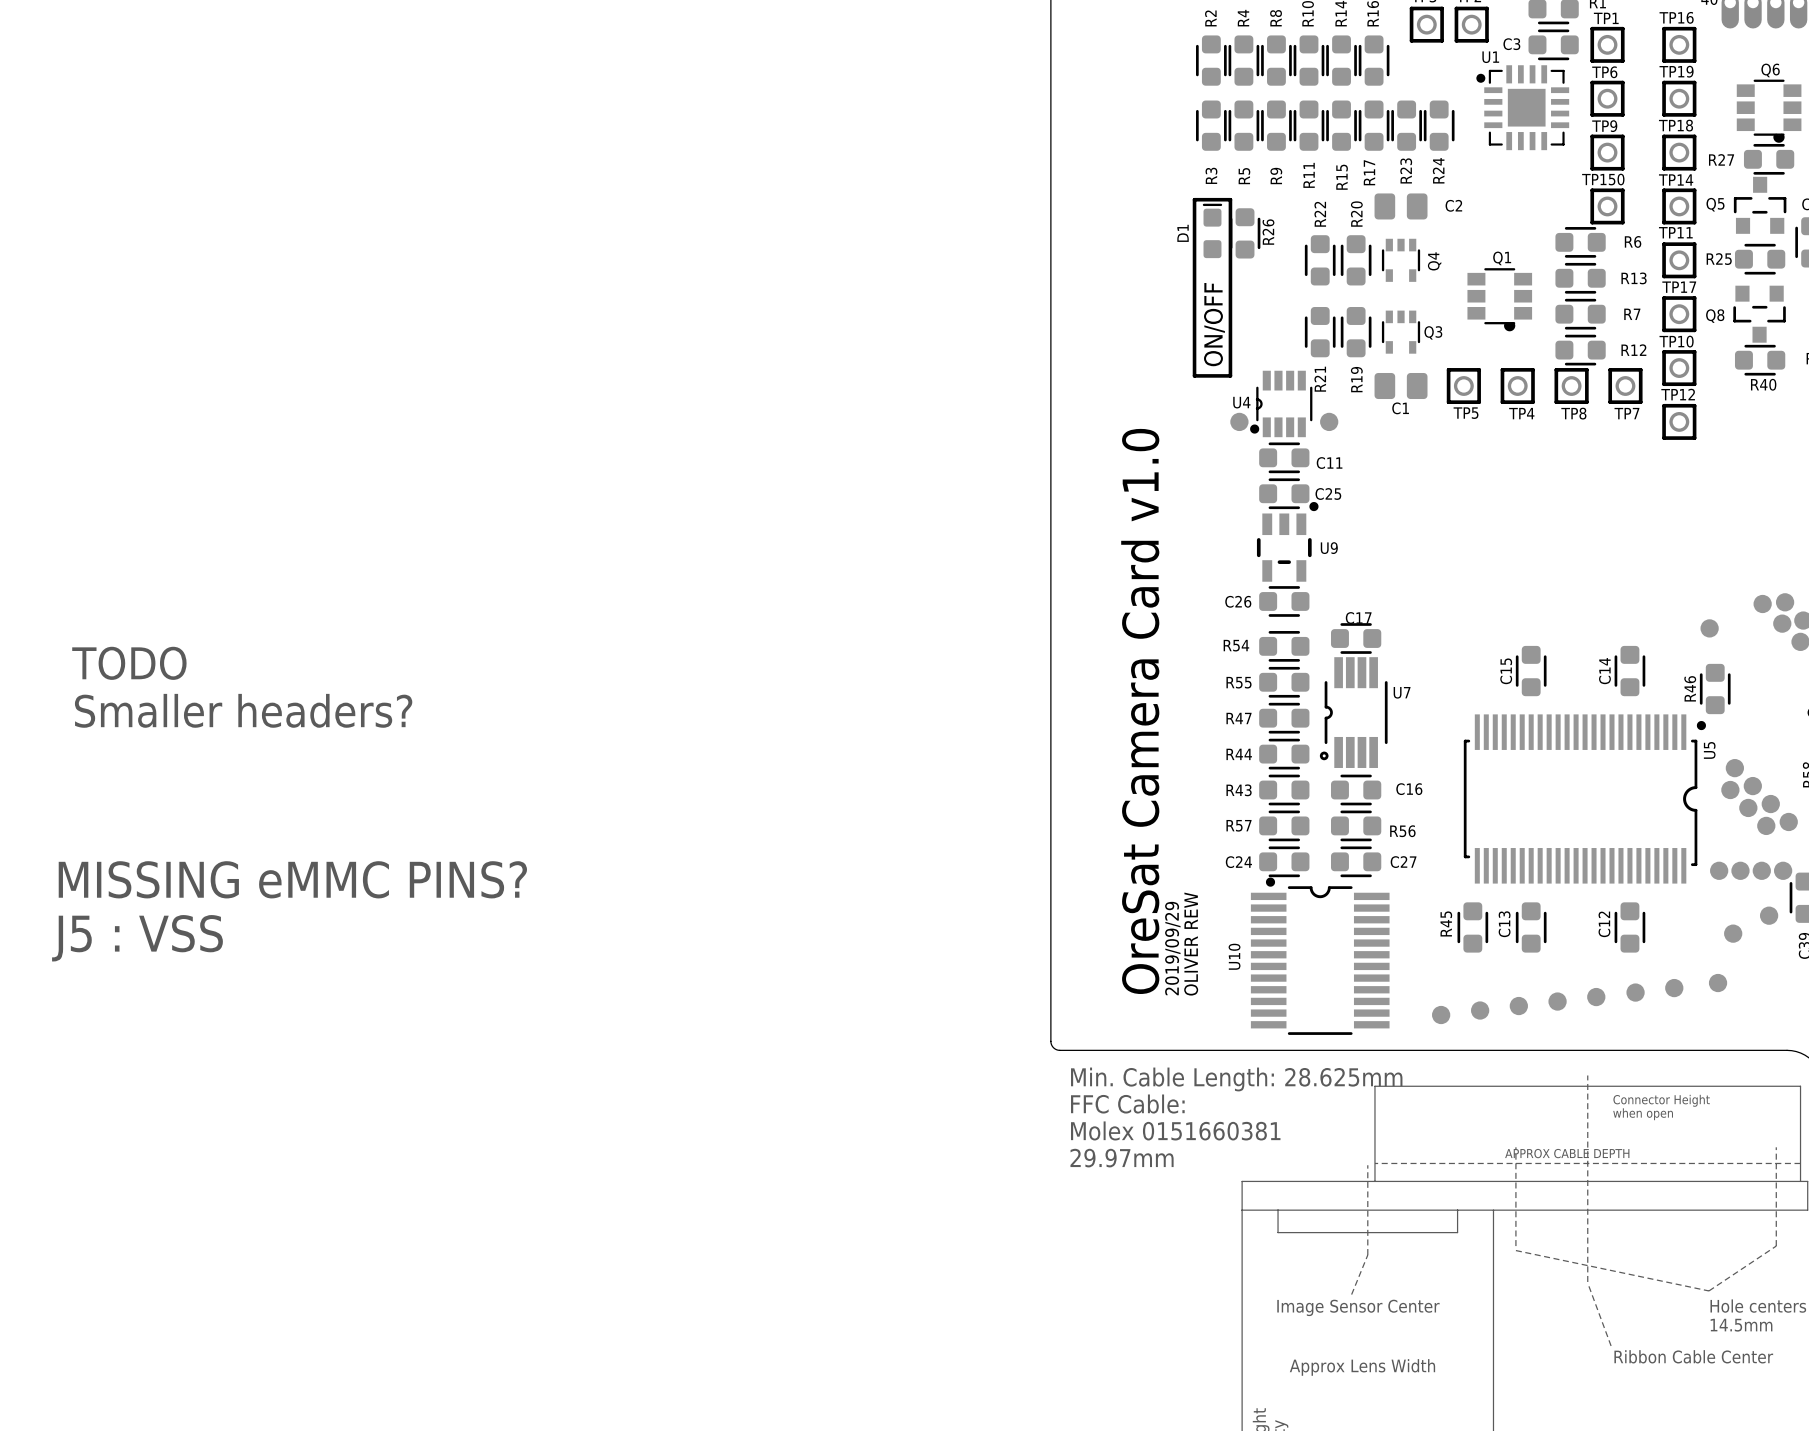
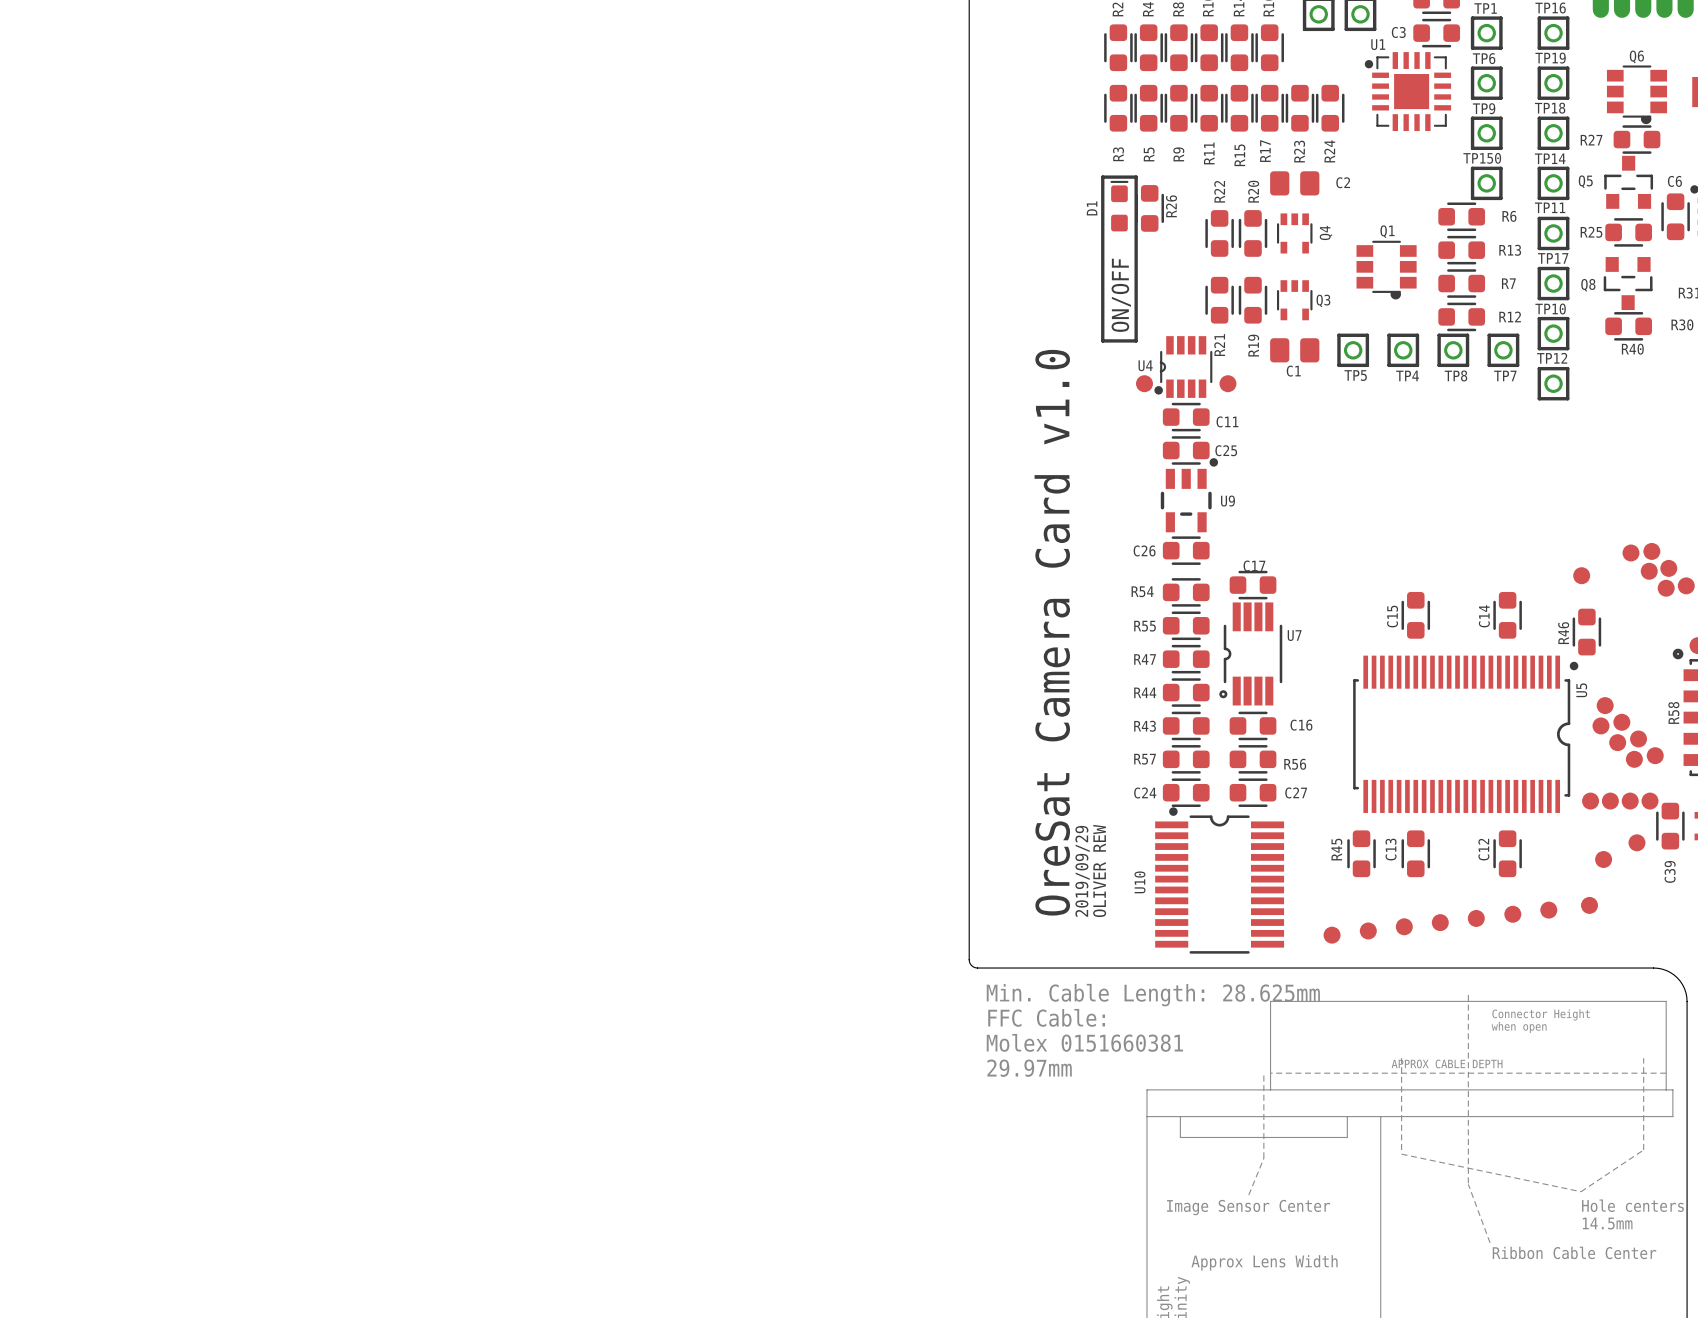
text: TODO (129, 663) -> none
text: Smaller headers? (243, 710) -> none
text: MISSING eMMC PINS? (292, 879) -> none
text: J5 : VSS (137, 938) -> none

